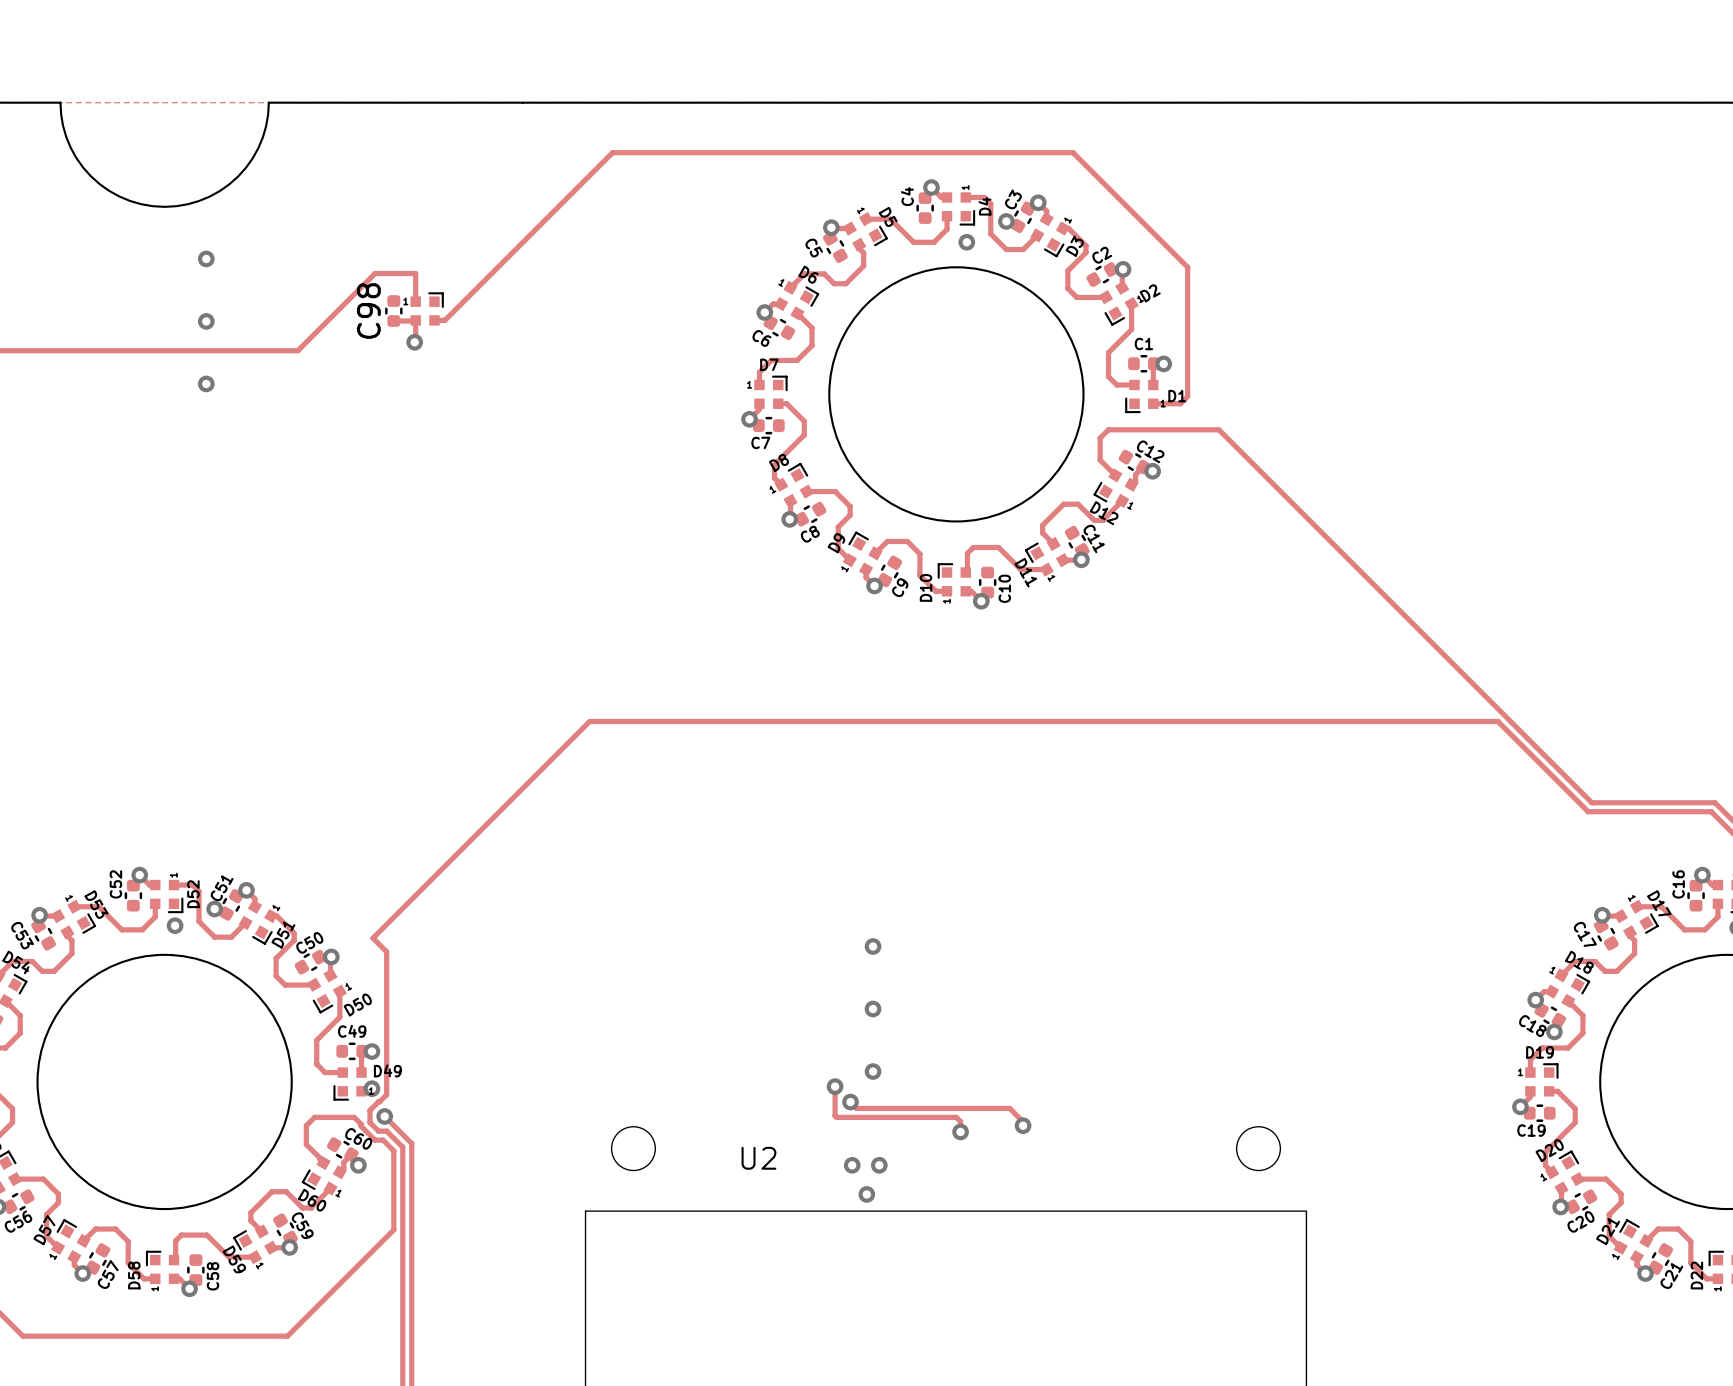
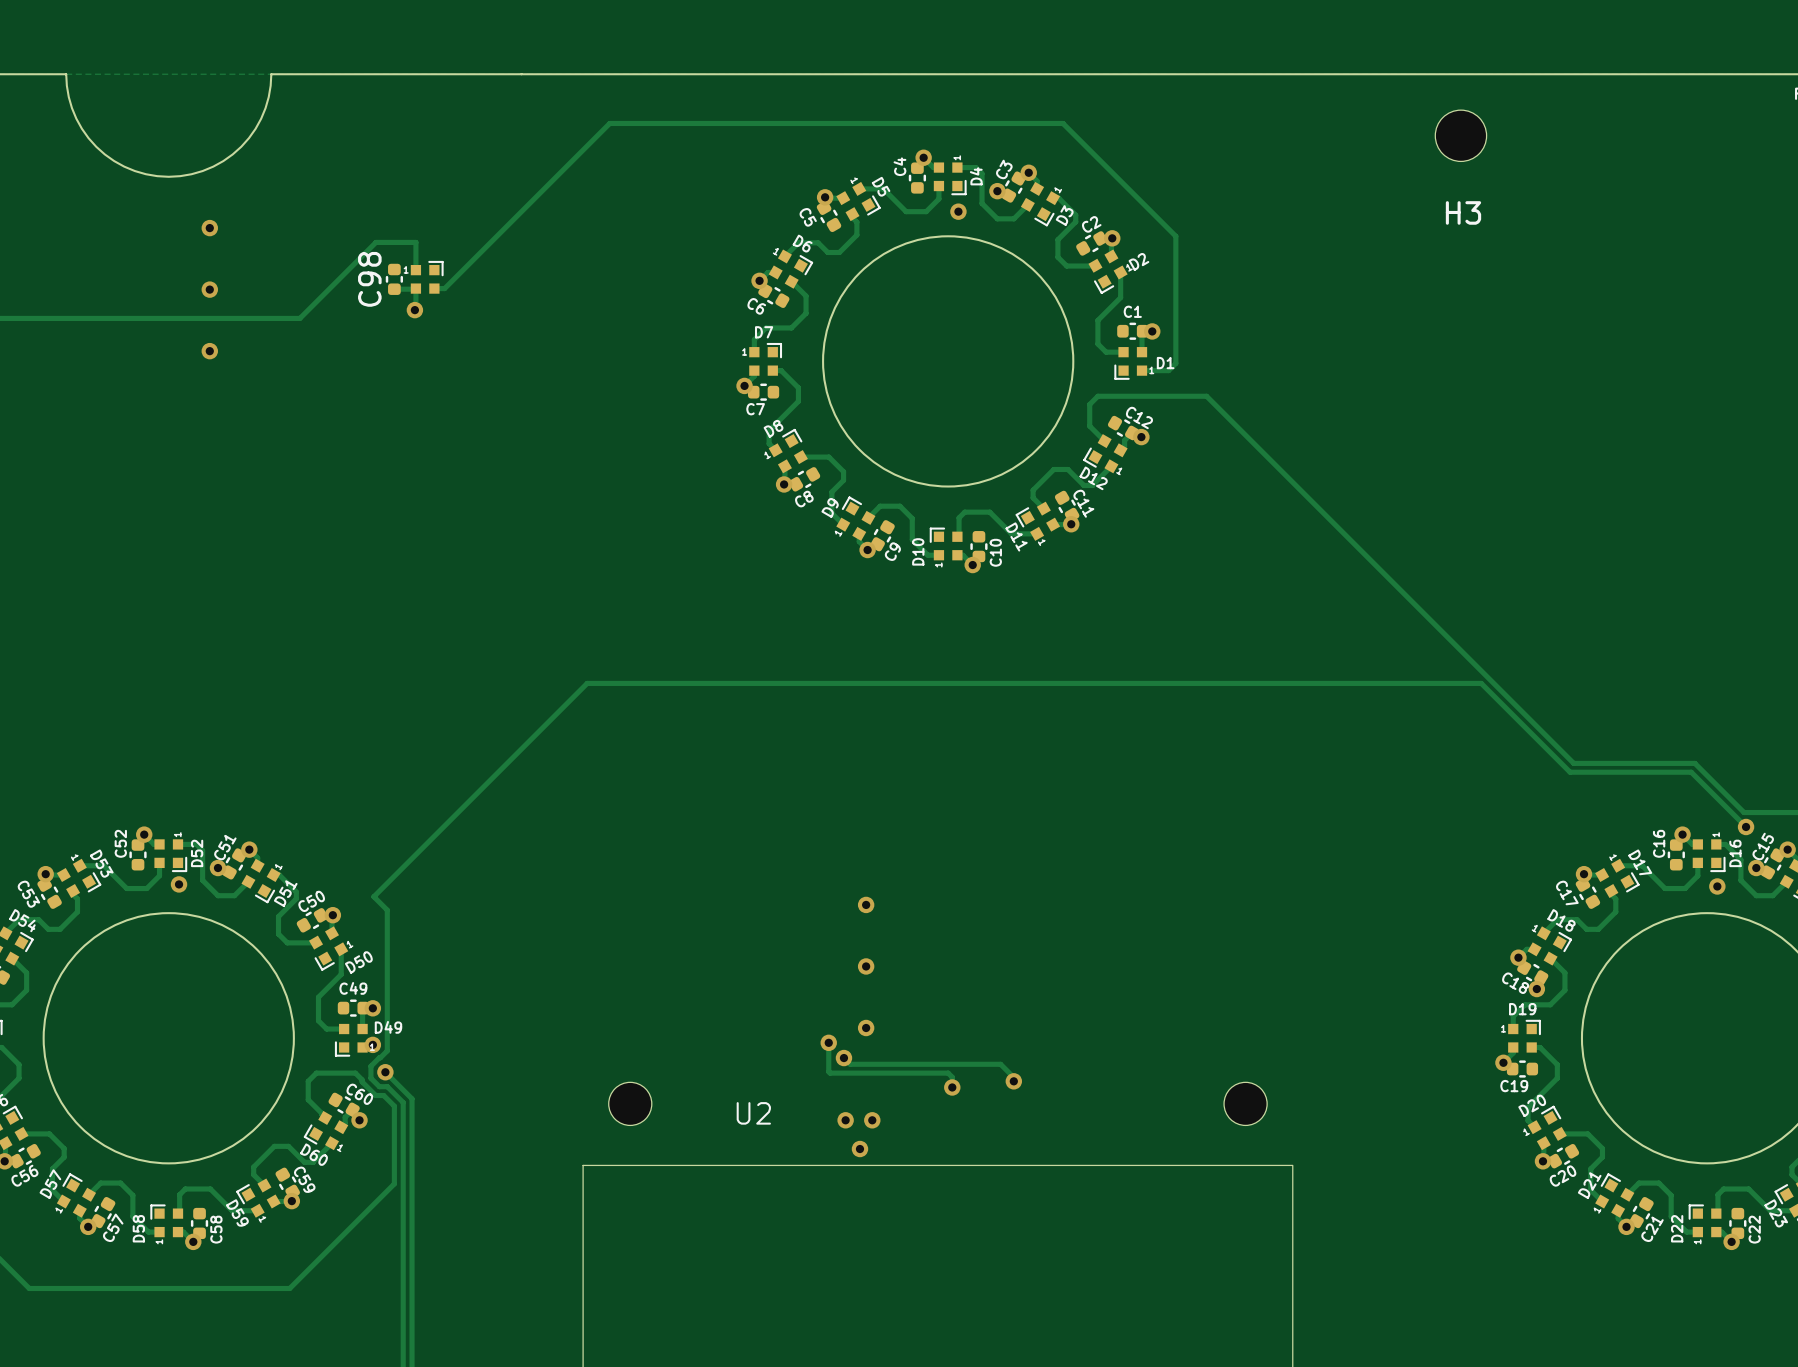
H3: none -> (1460, 135)

